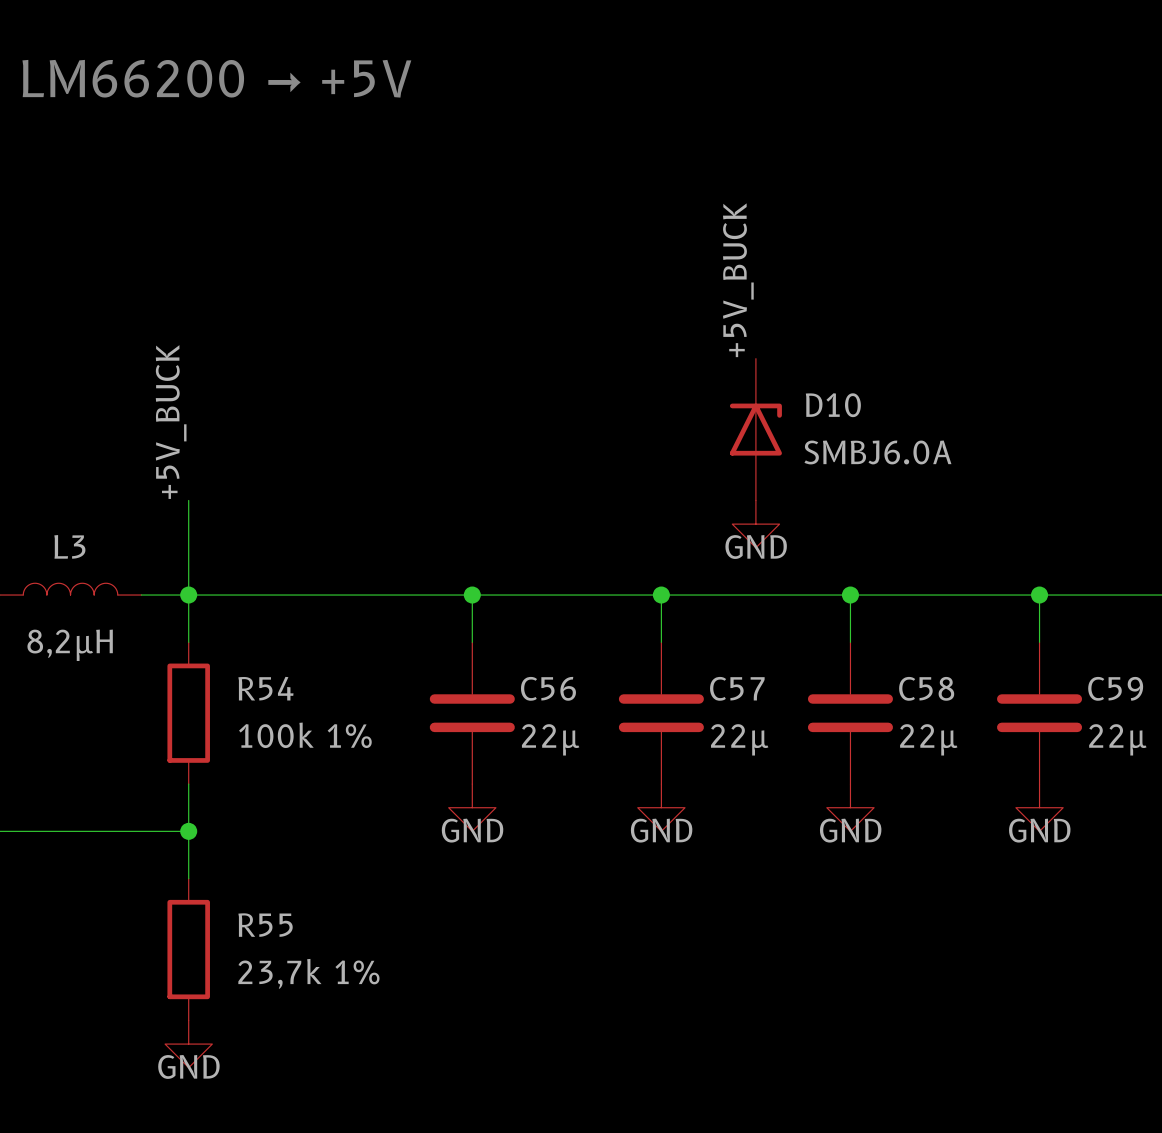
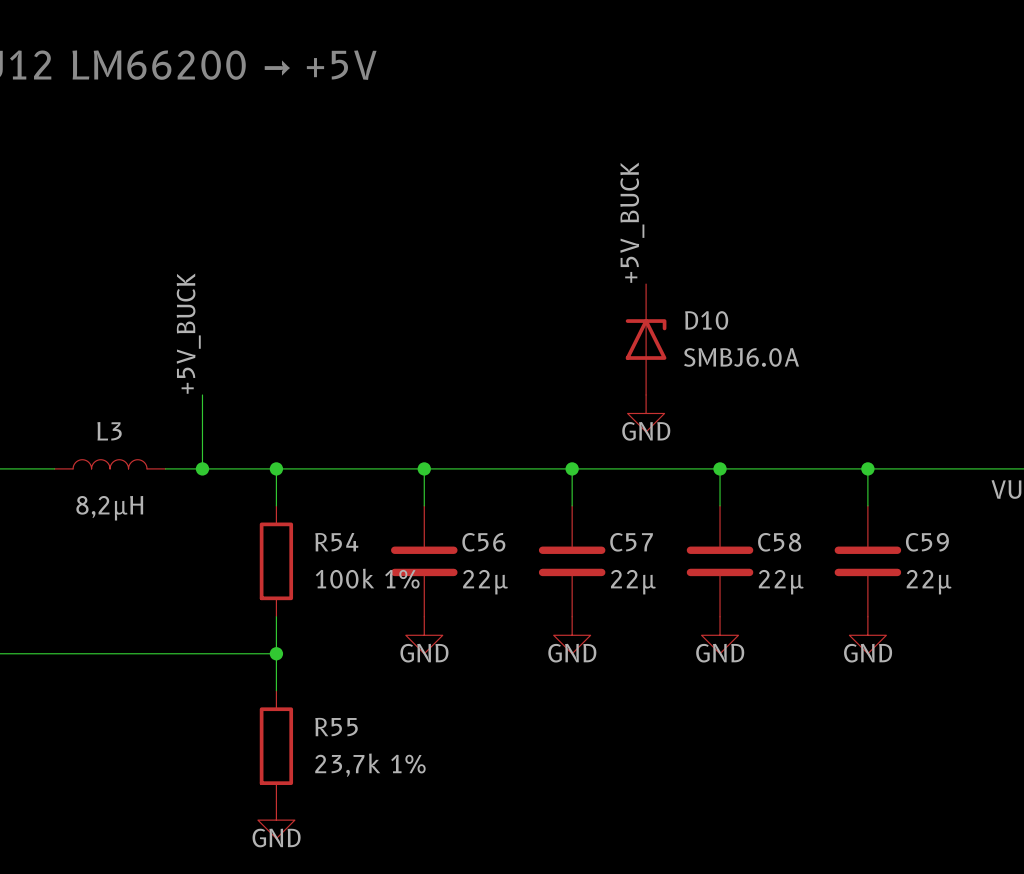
wire: (188, 595) (188, 642) -> (276, 468) (276, 505)
junction: none -> (276, 468)
R54 position: (188, 713) -> (276, 561)
wire: (188, 784) (188, 878) -> (276, 616) (276, 690)
wire: none -> (202, 653) (276, 653)
junction position: (188, 831) -> (276, 653)
R55 position: (188, 949) -> (276, 746)
power symbol position: GND (188, 1044) -> GND (276, 820)

